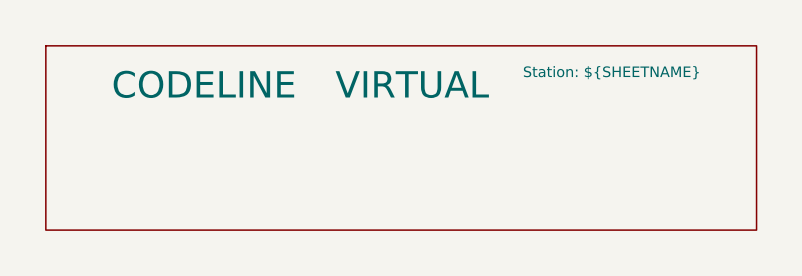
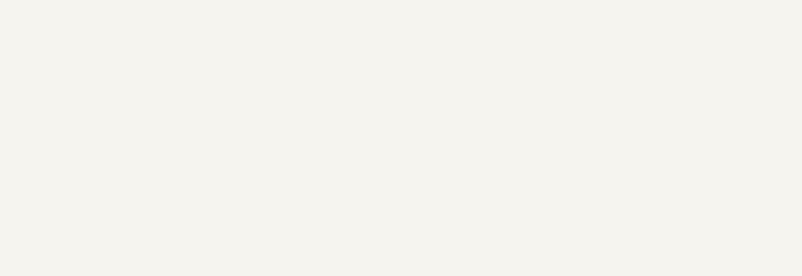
part: VIRTUAL (401, 137) -> none

